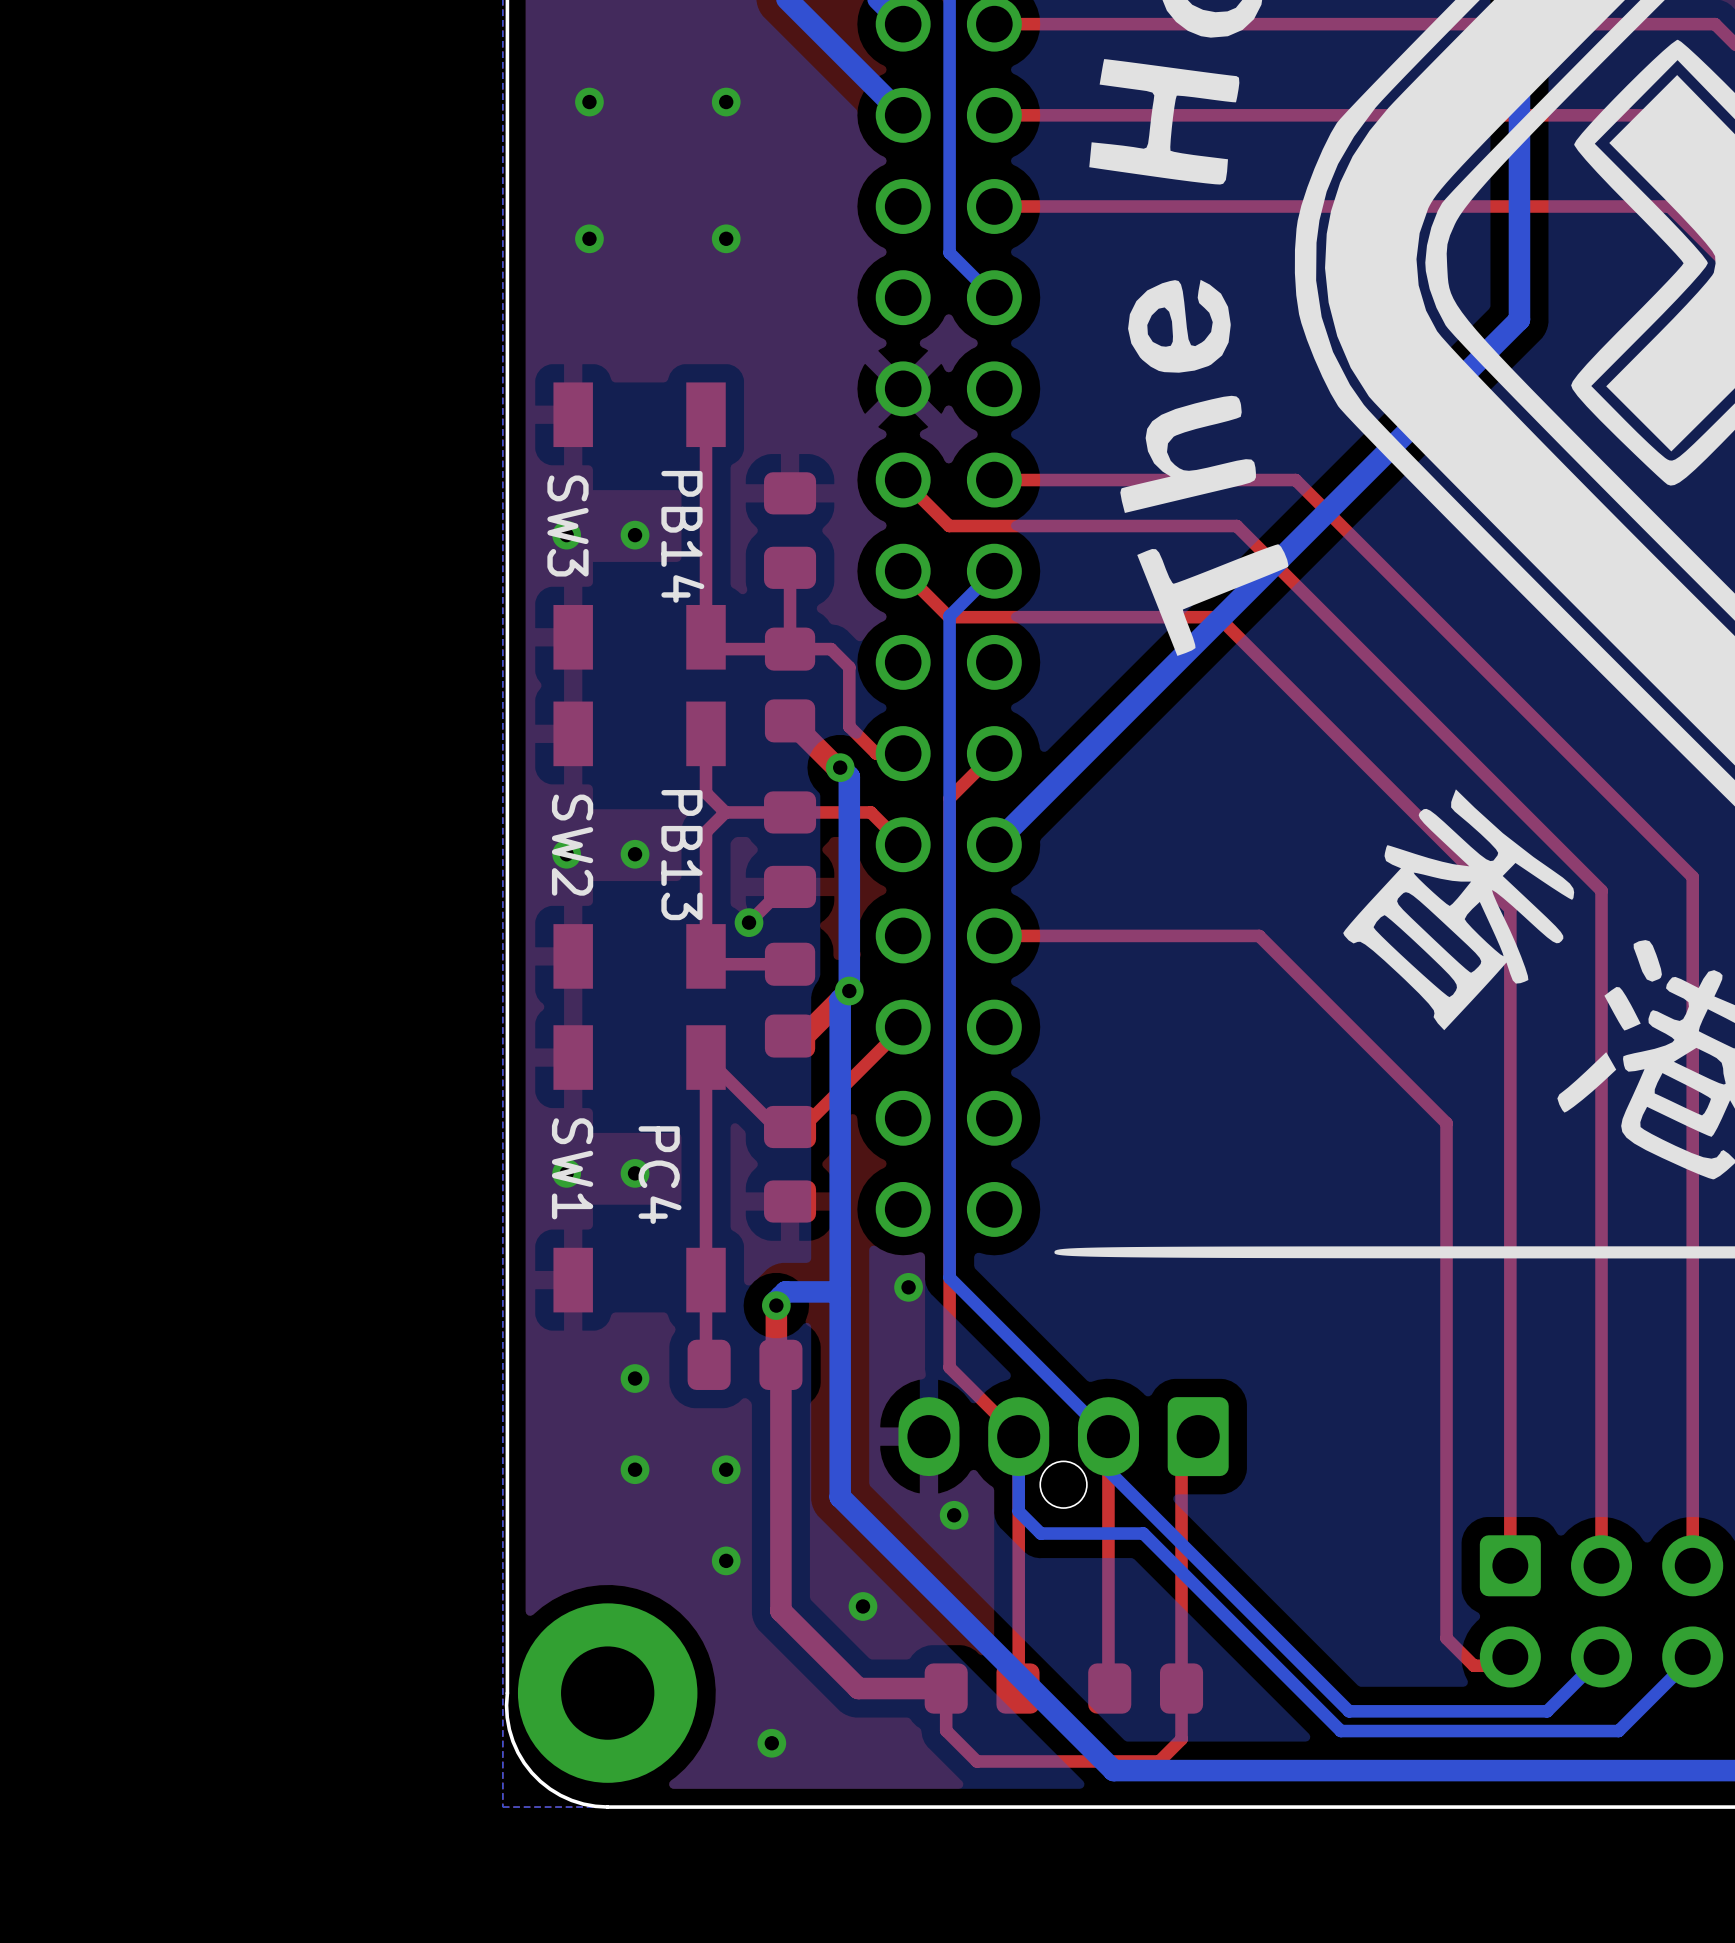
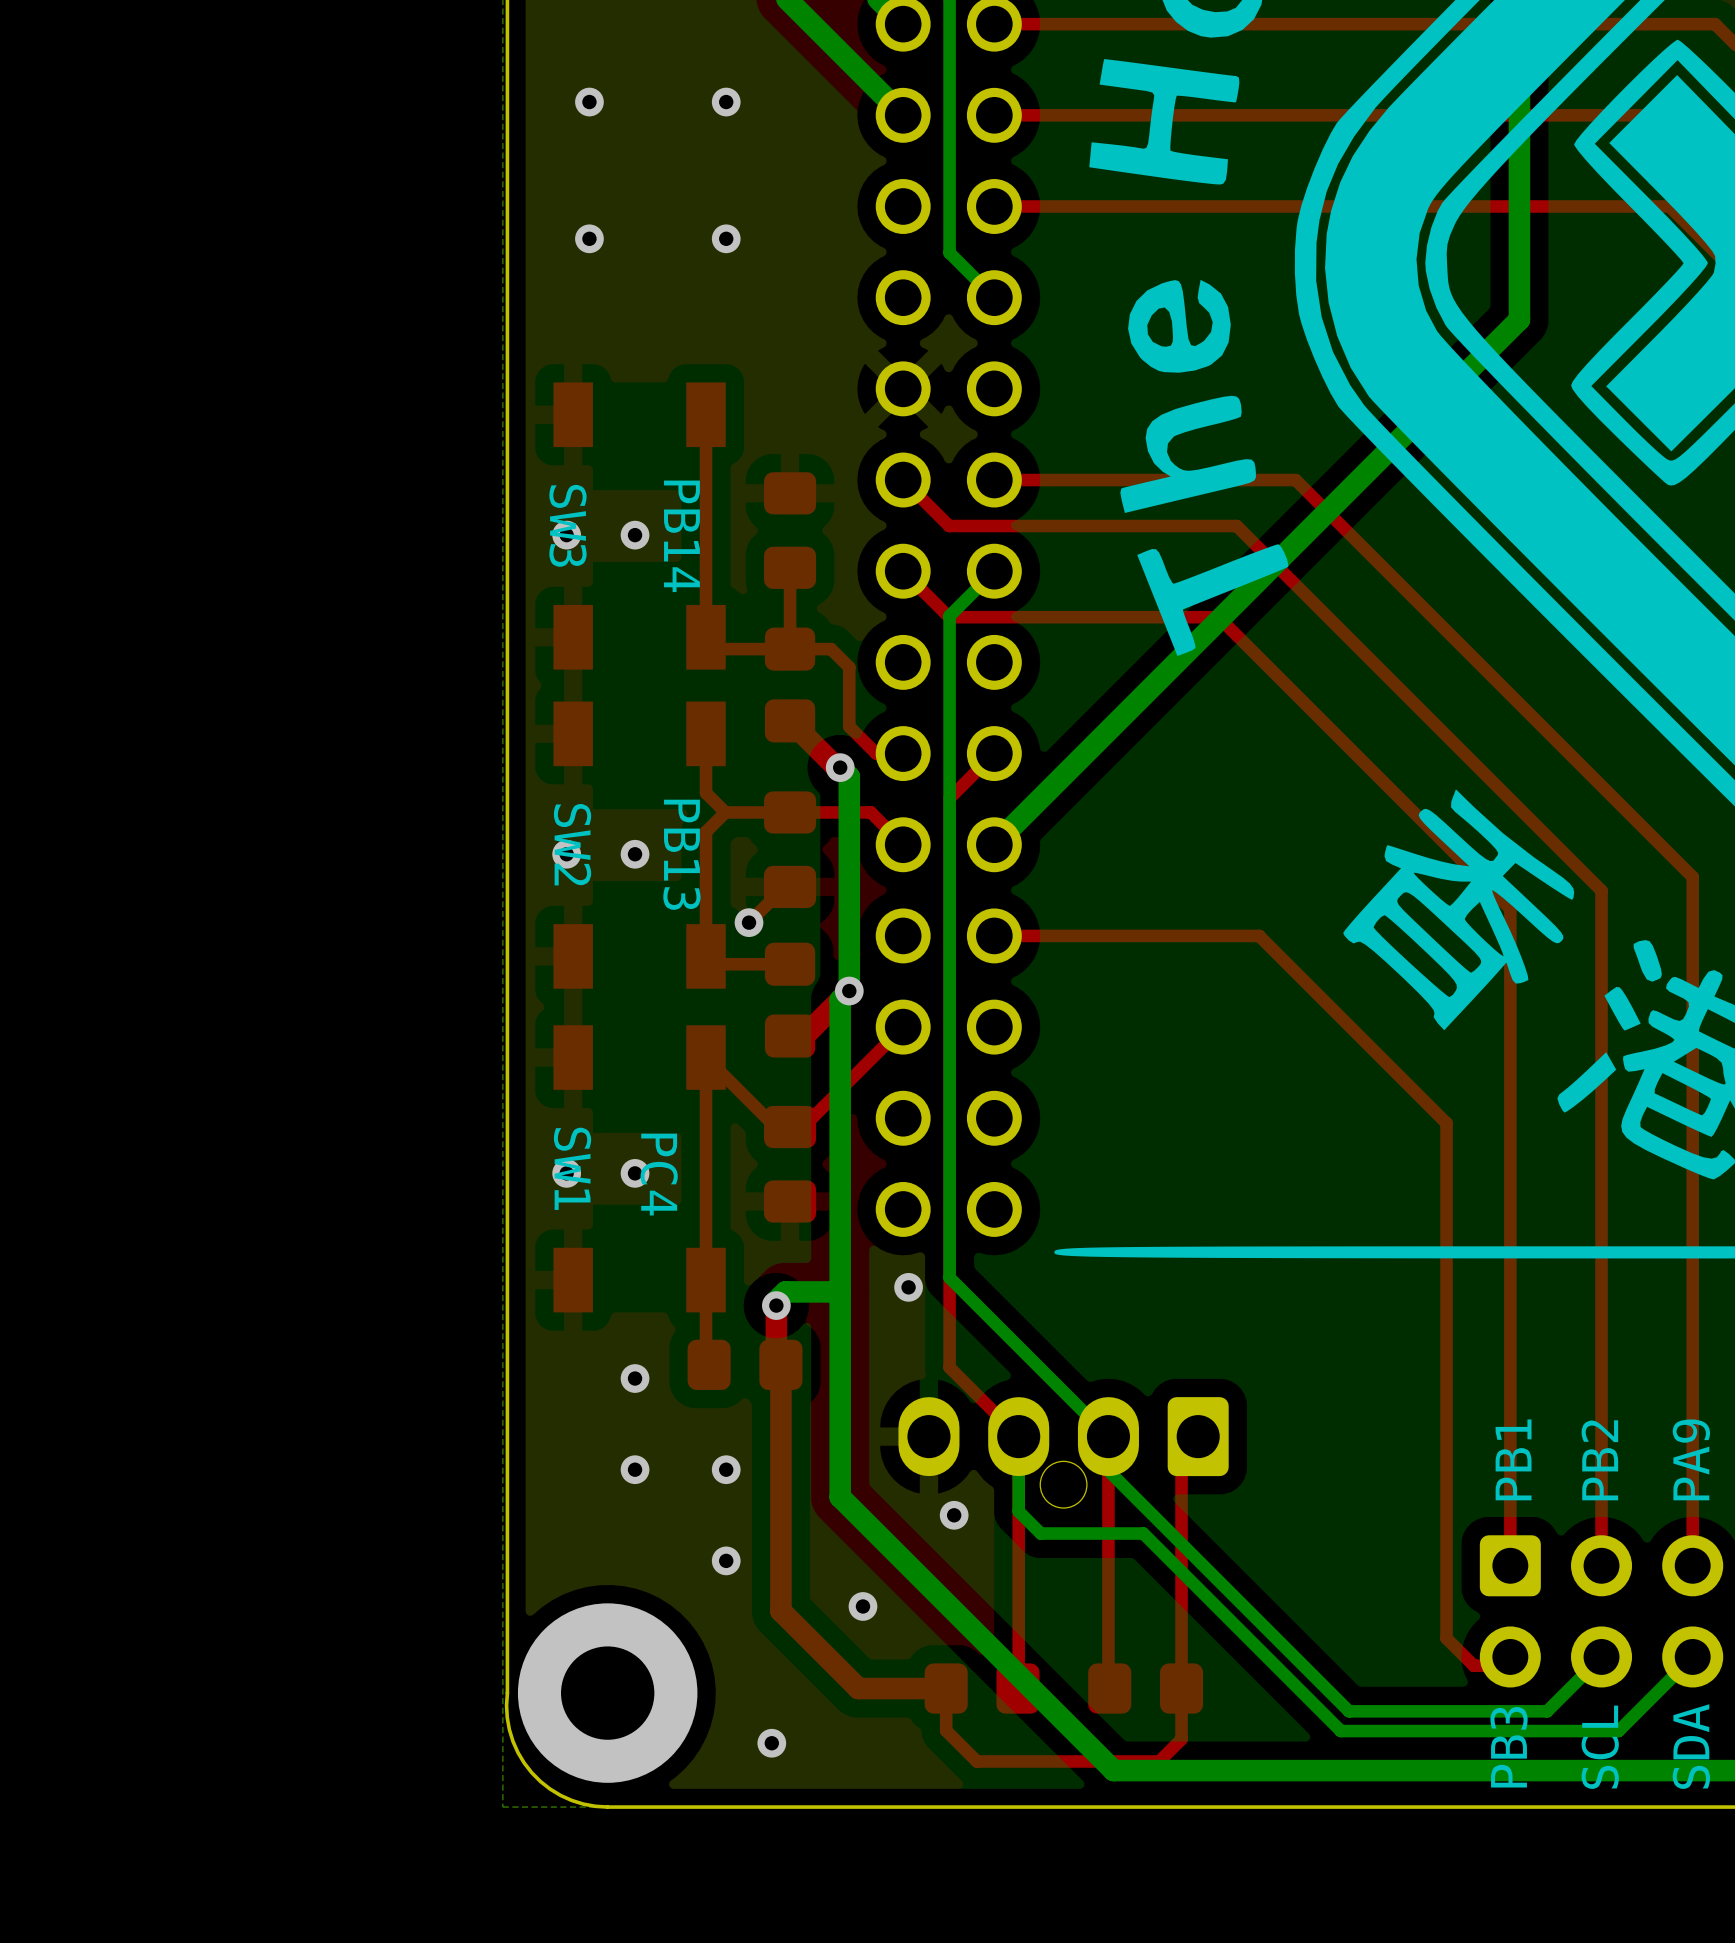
text: none -> PB1 (1513, 1459)
text: none -> PB2 (1599, 1460)
text: none -> PA9 (1691, 1459)
text: none -> PB3 (1509, 1747)
text: none -> SCL (1600, 1747)
text: none -> SDA (1691, 1746)

